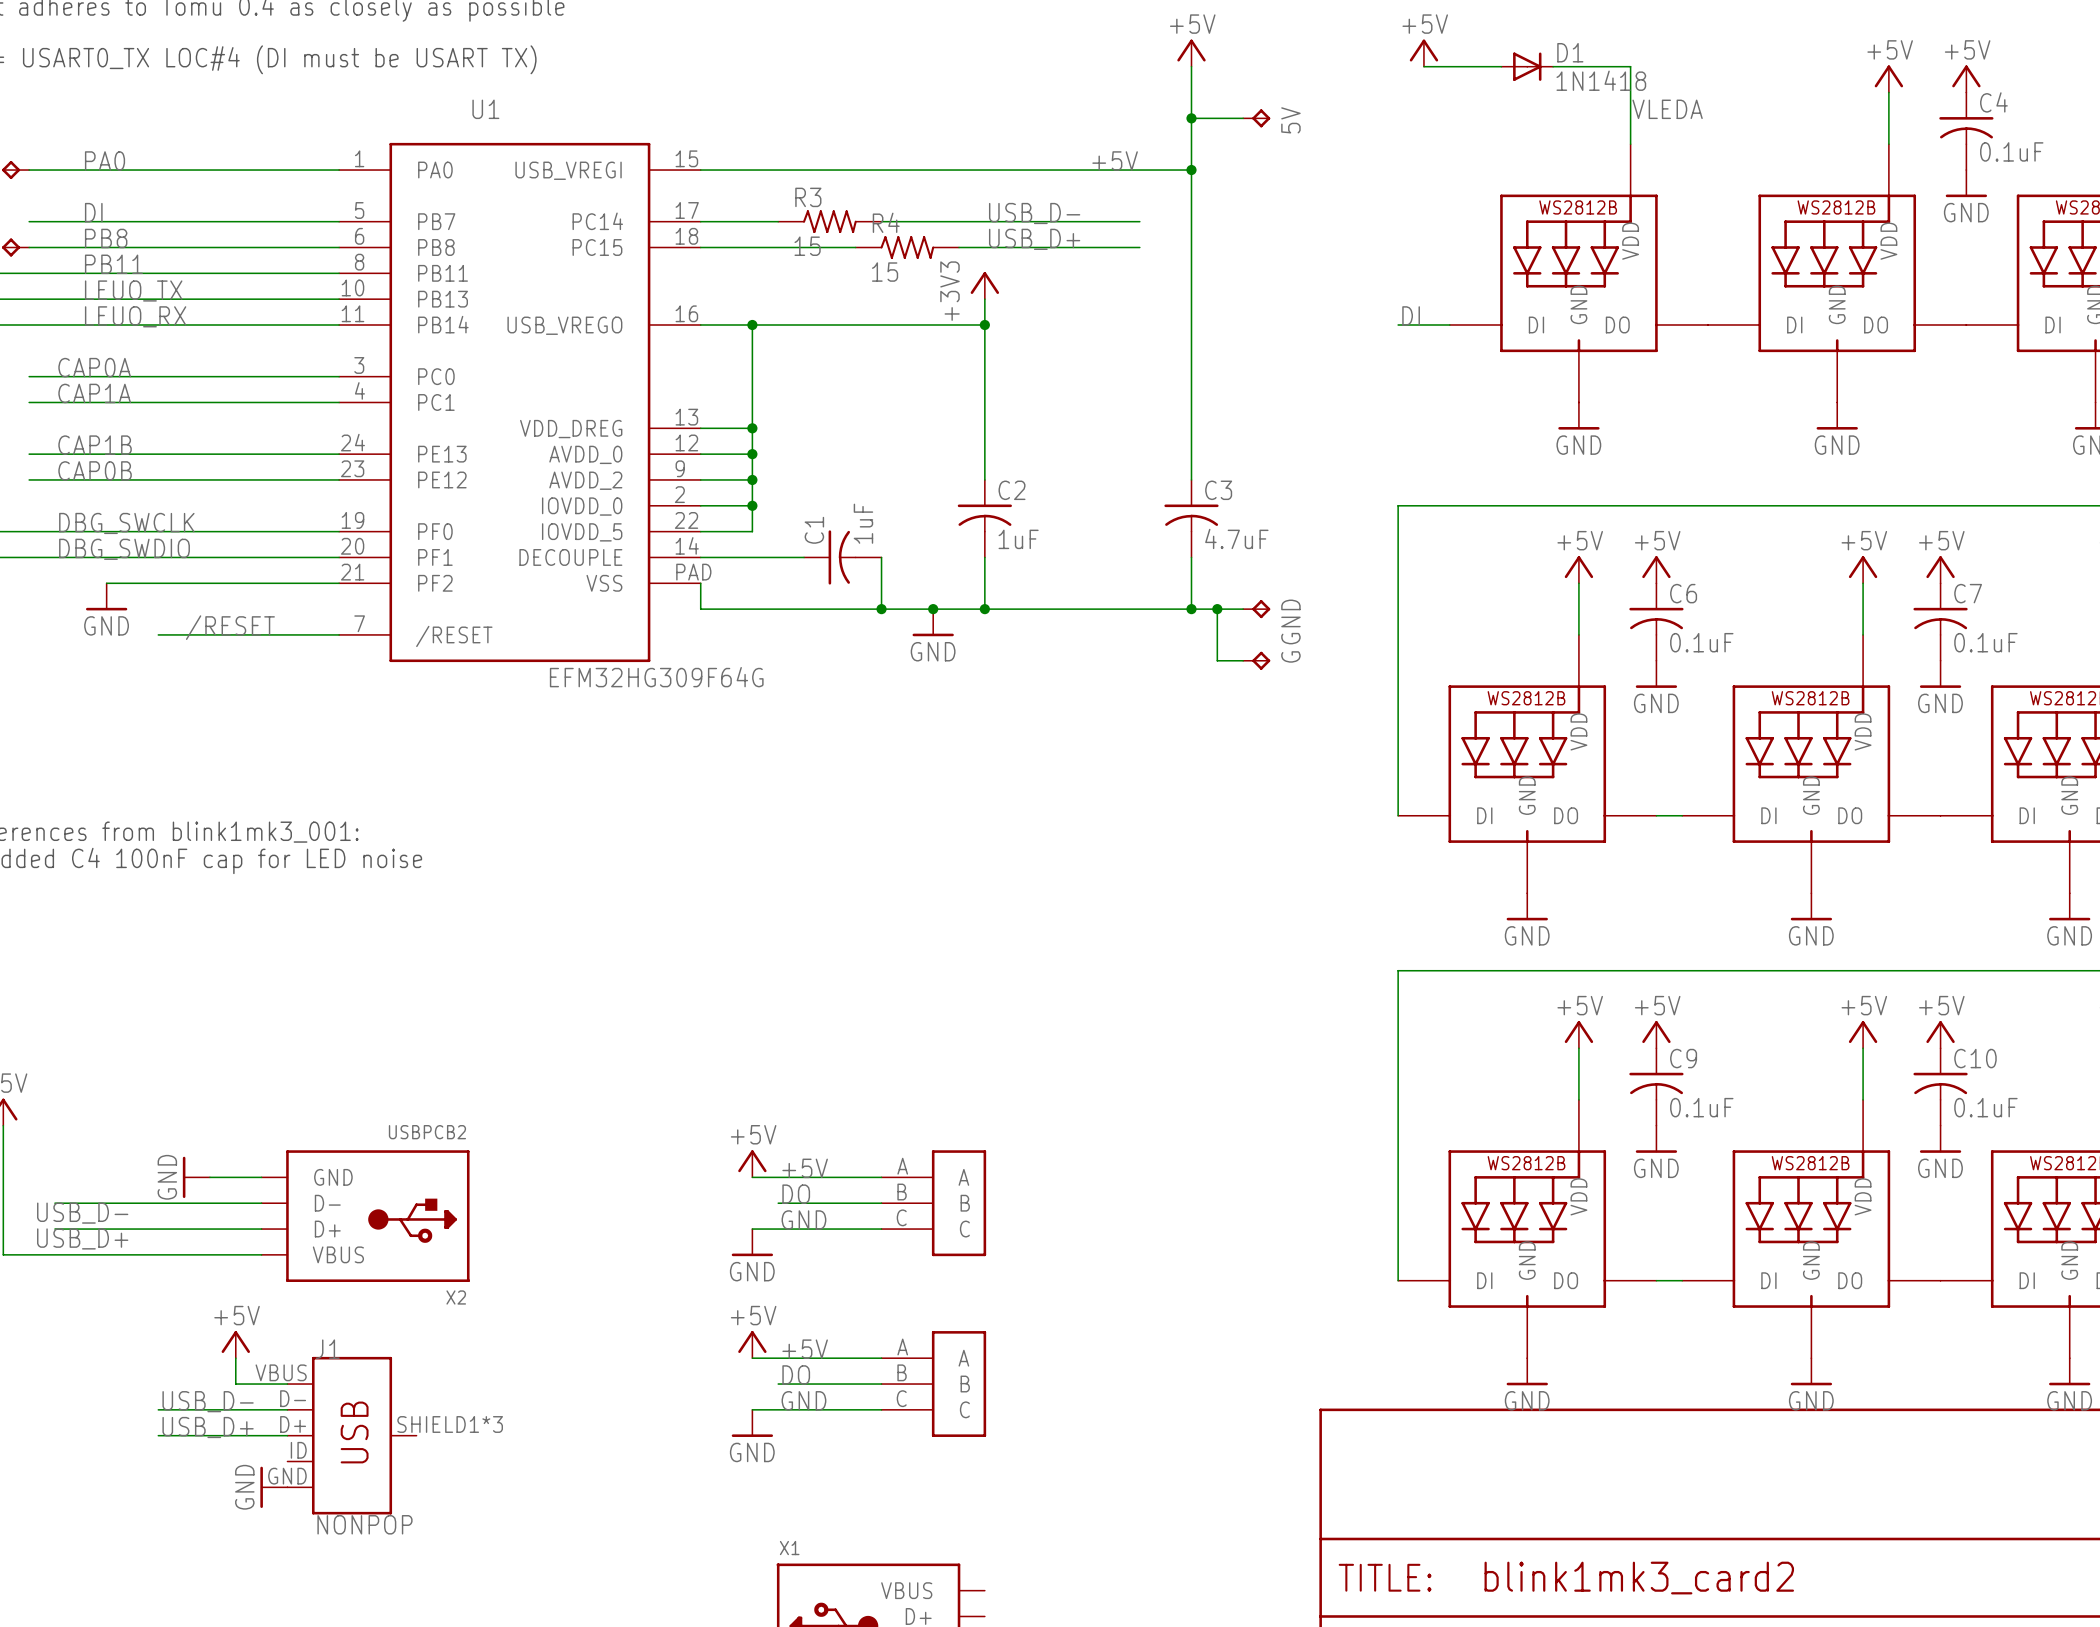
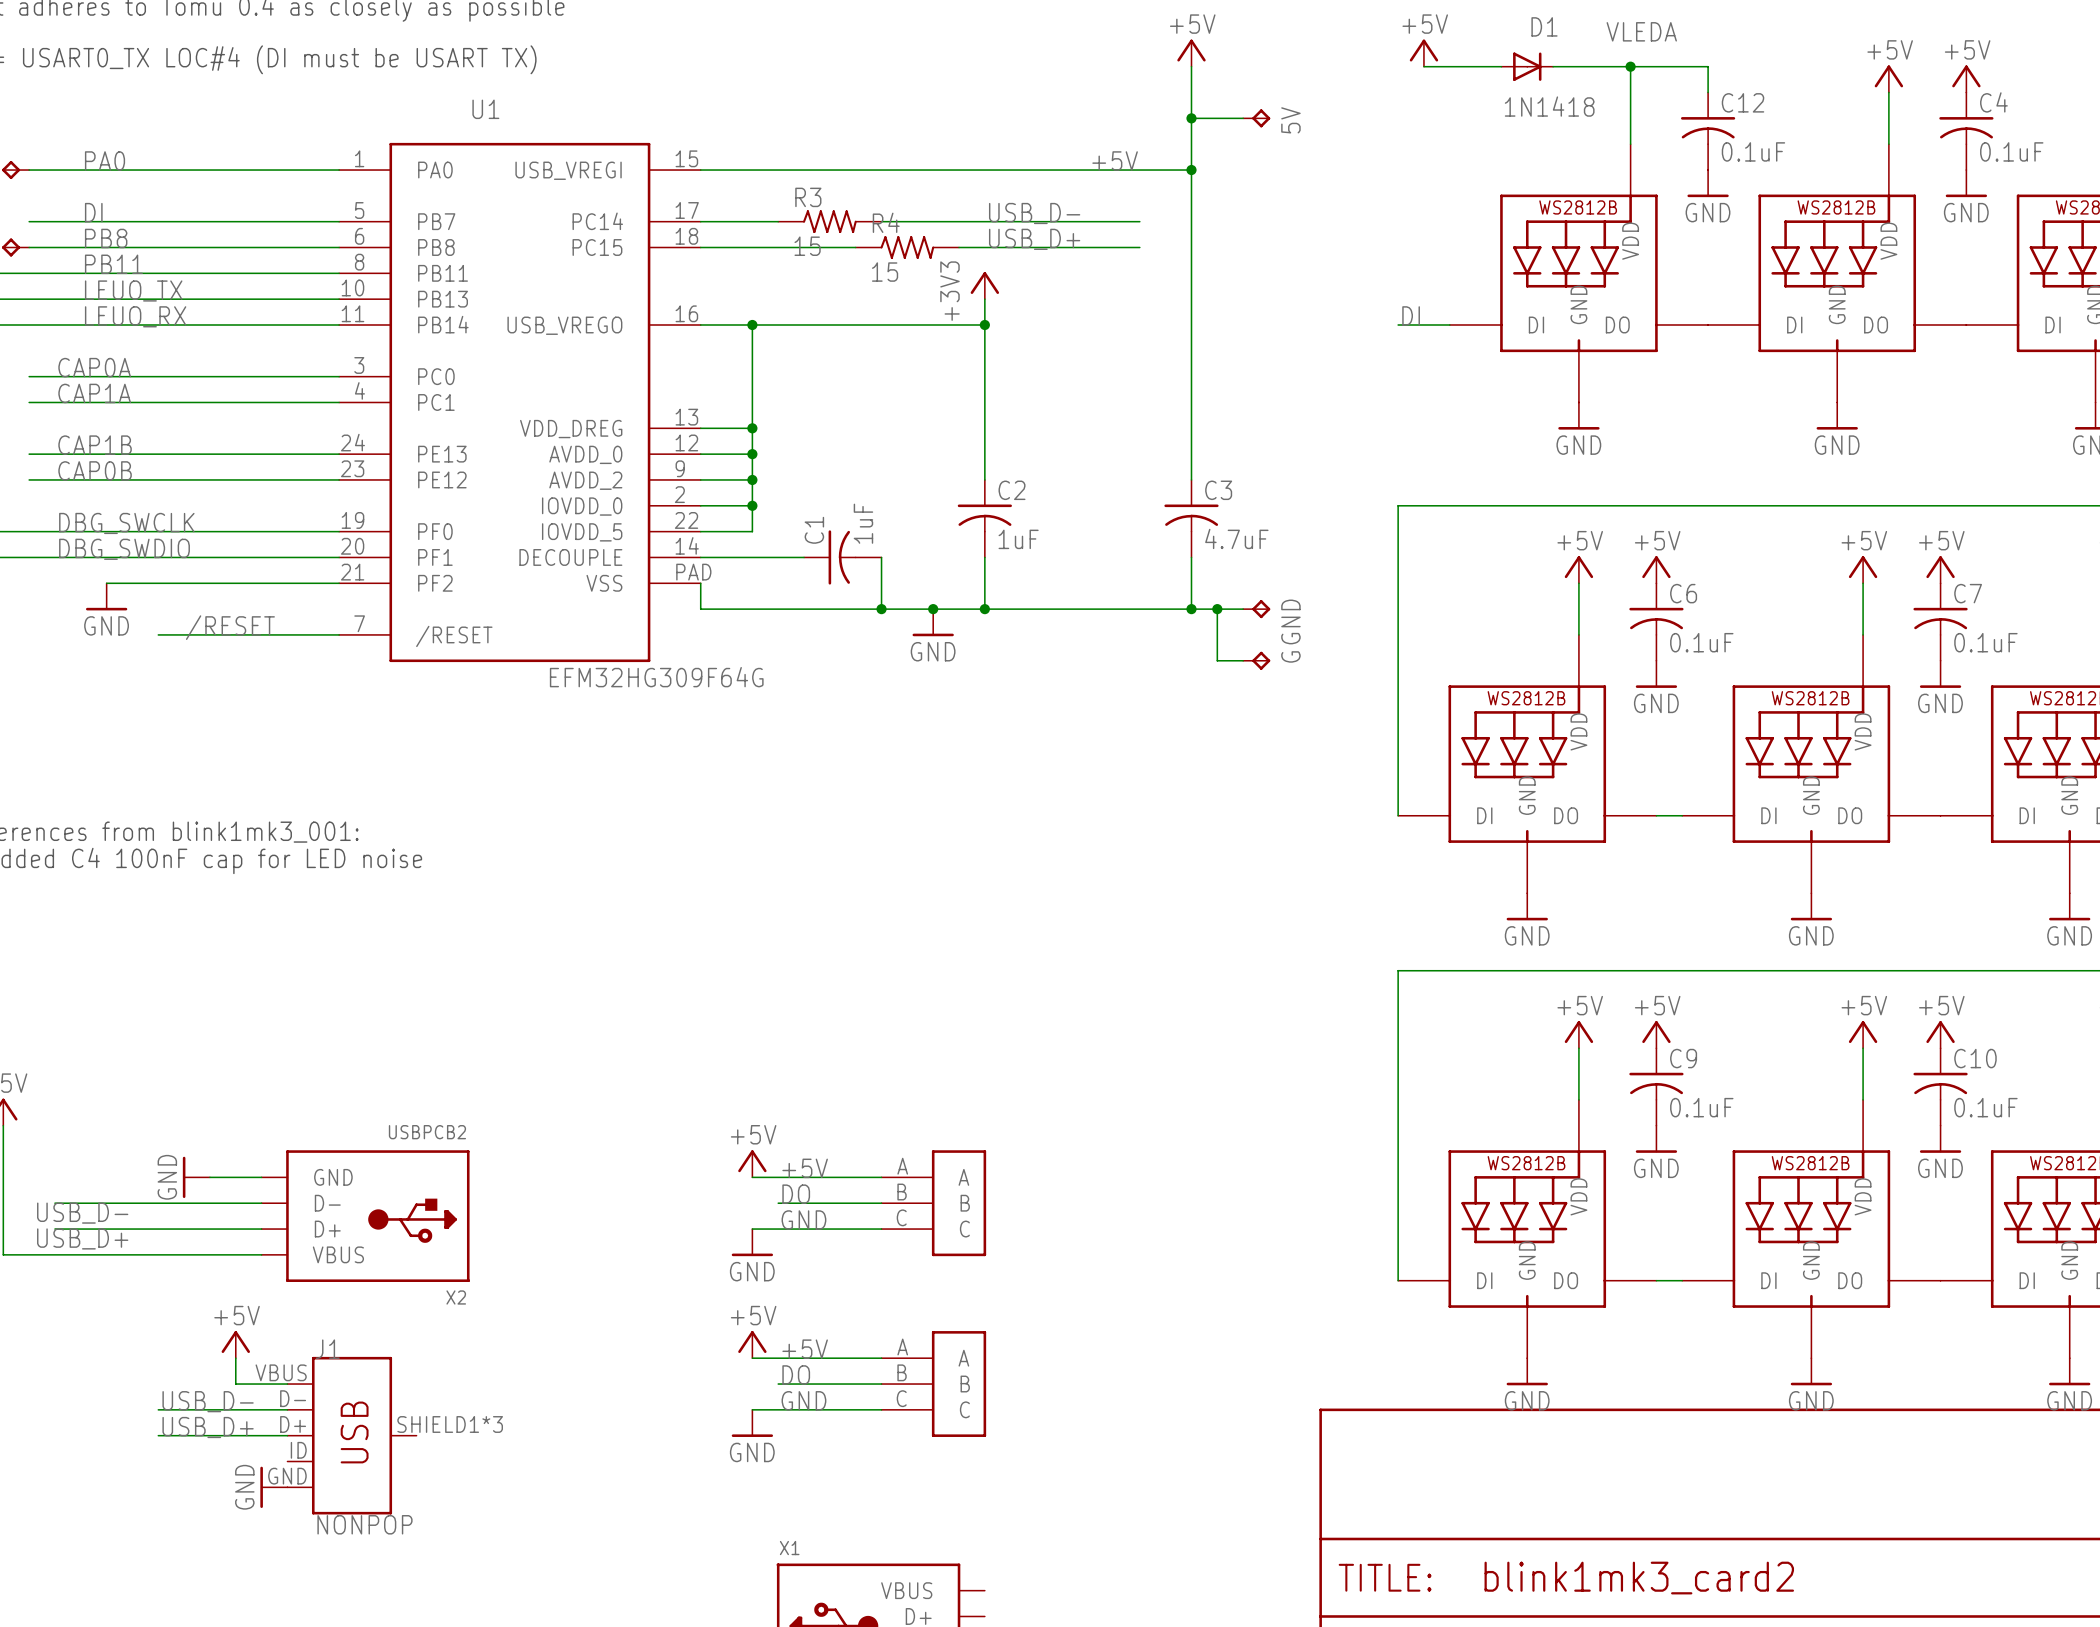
D1 name position: D1 (1570, 52) -> D1 (1544, 26)
wire: none -> (1630, 66) (1708, 66) (1708, 92)
junction: none -> (1630, 66)
D1 value position: 1N1418 (1601, 80) -> 1N1418 (1549, 106)
label position: VLEDA (1667, 109) -> VLEDA (1641, 31)
C12: none -> 0.1uF (1708, 131)
power symbol: none -> GND (1708, 183)

